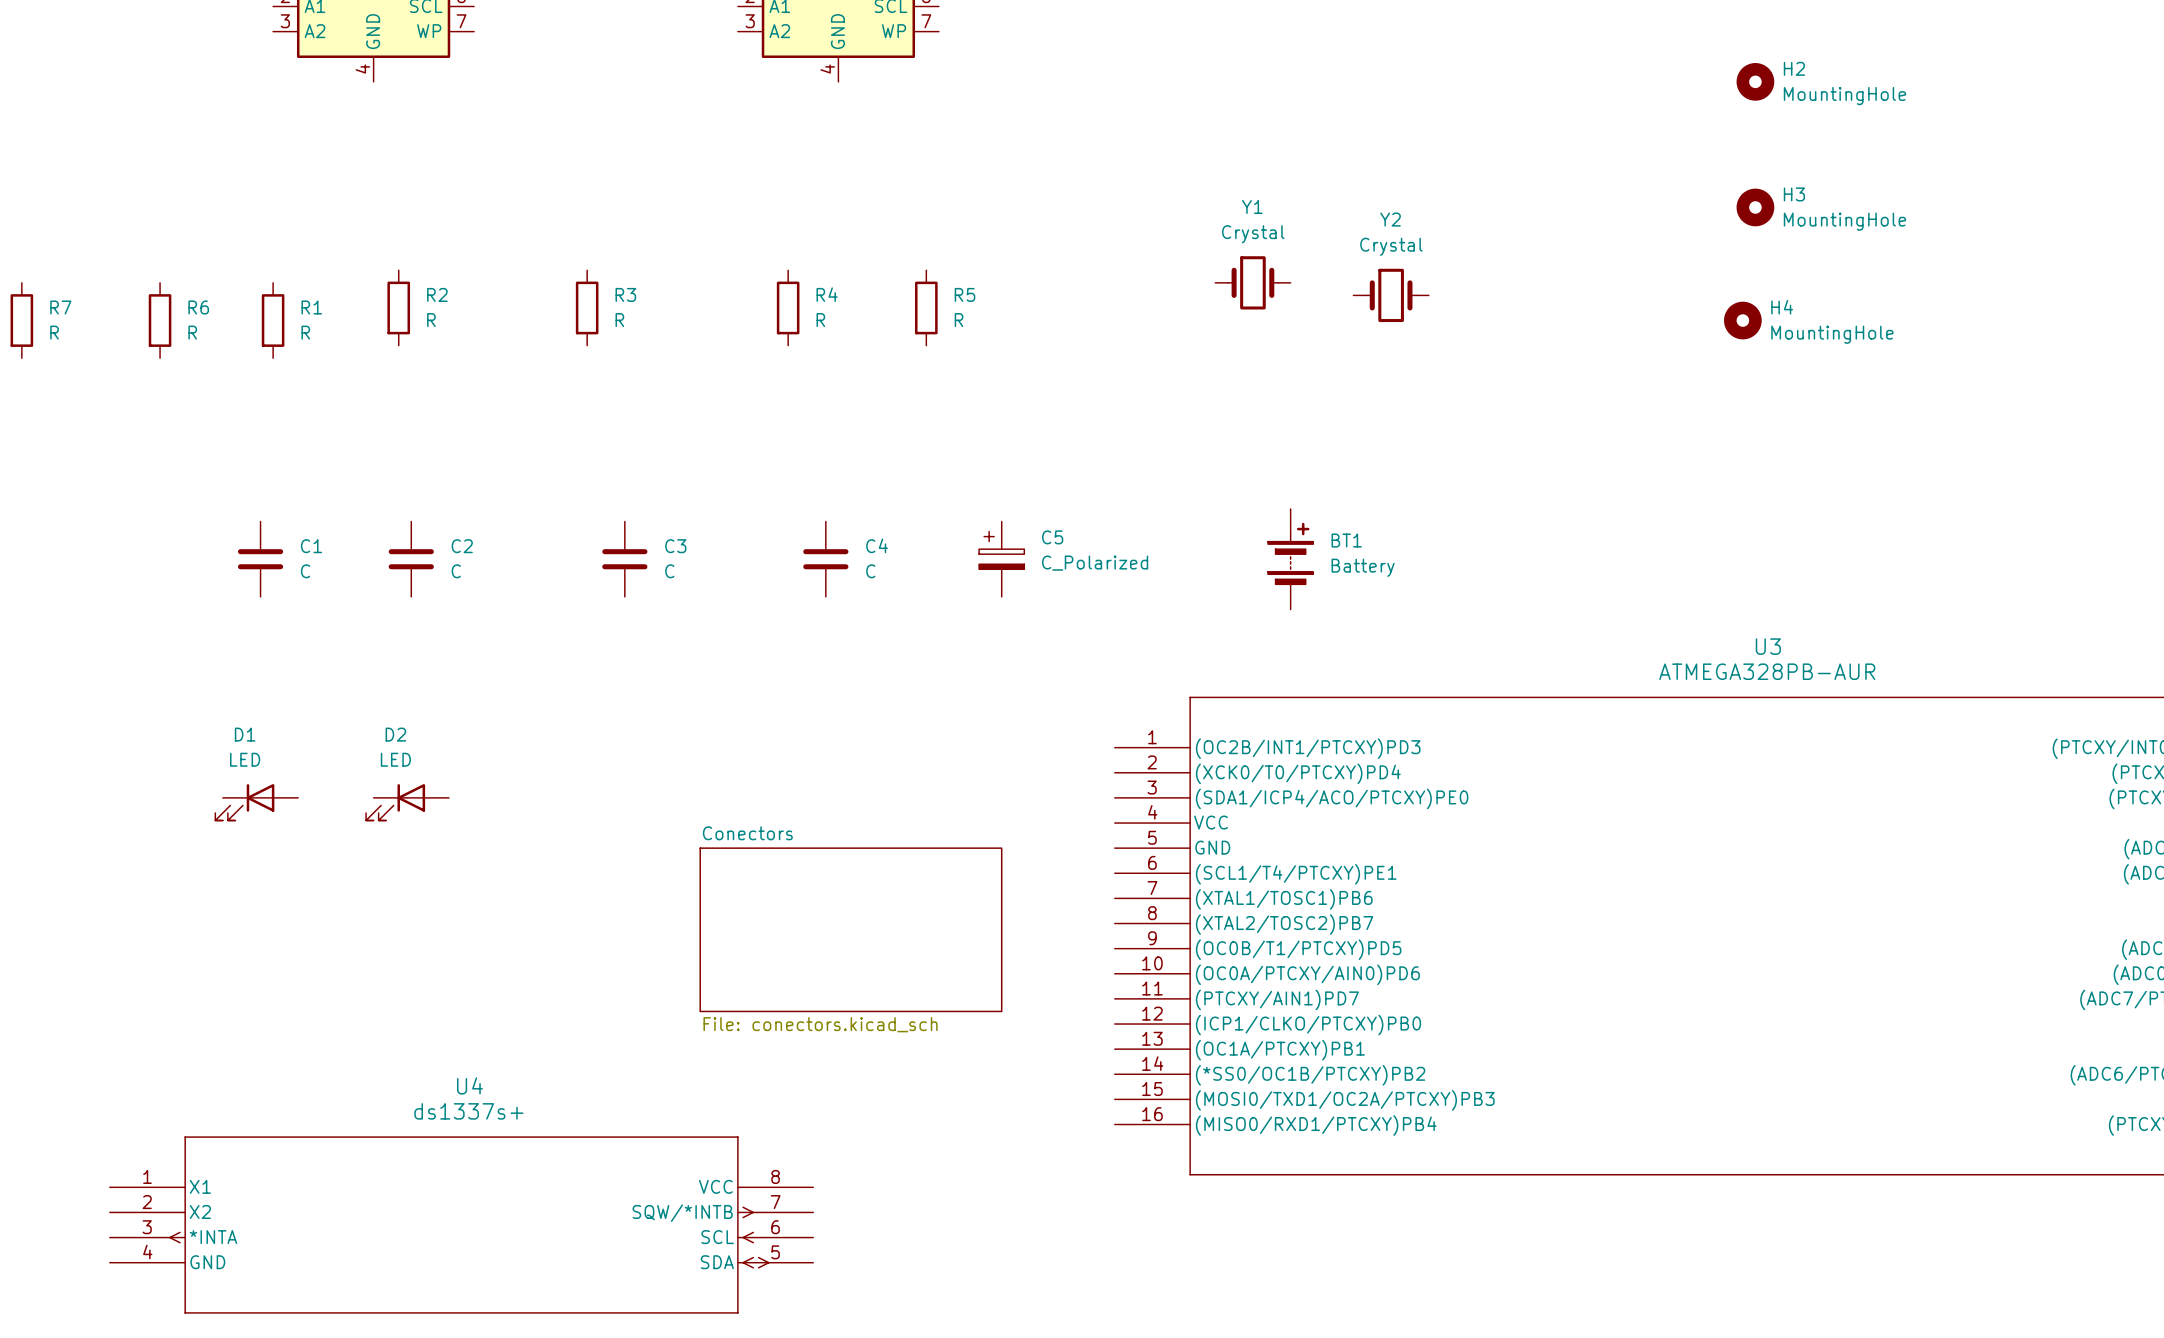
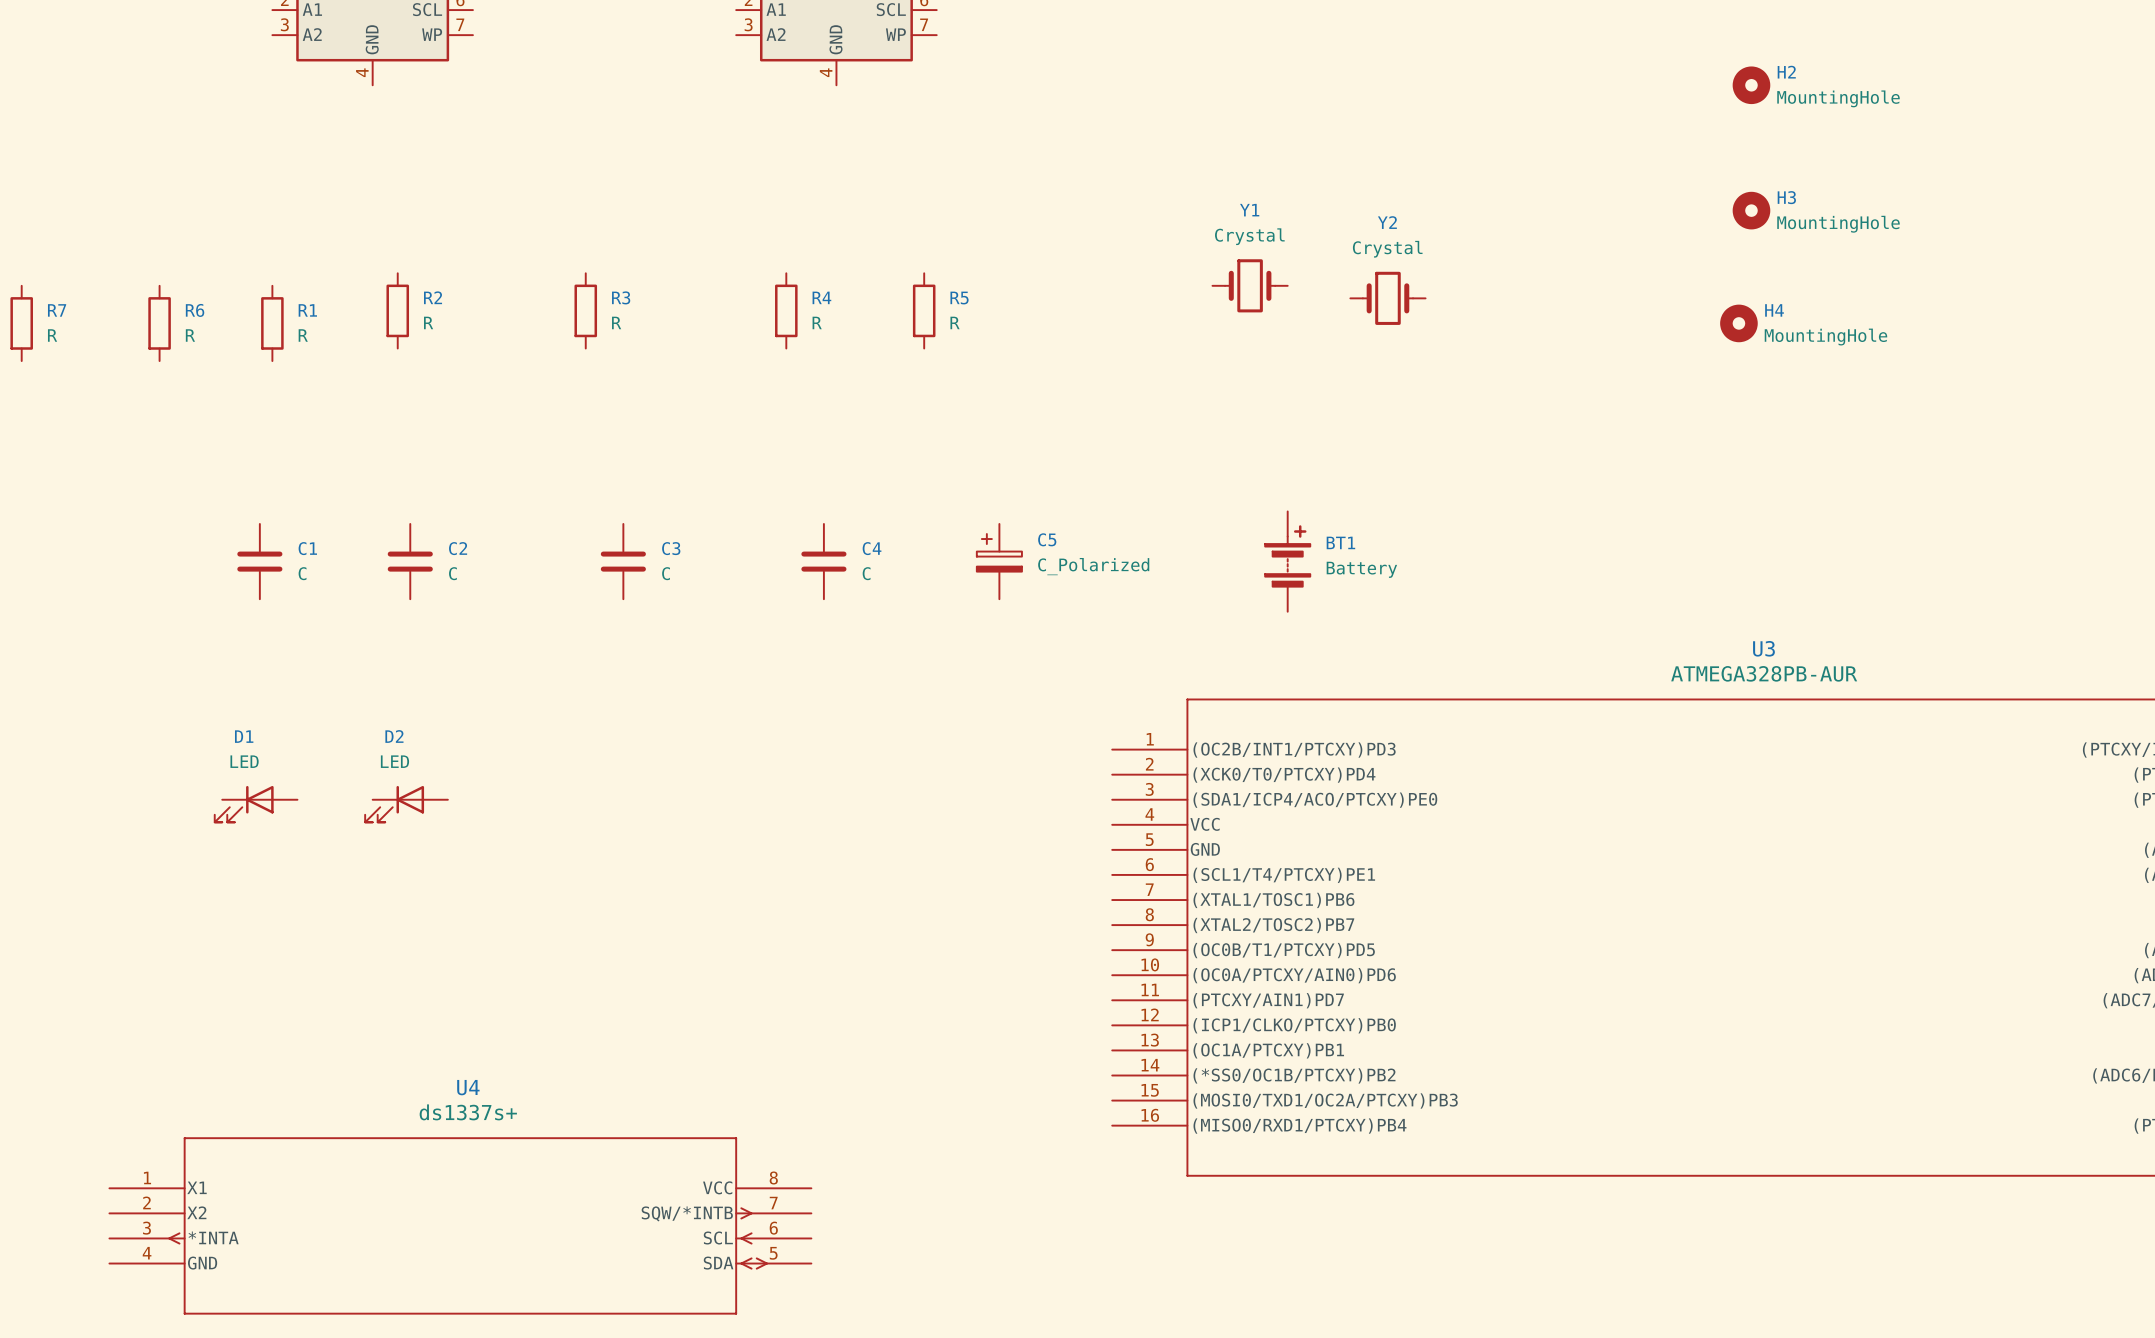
sheet Conectors: File: conectors.kicad_sch (850, 929) -> none

